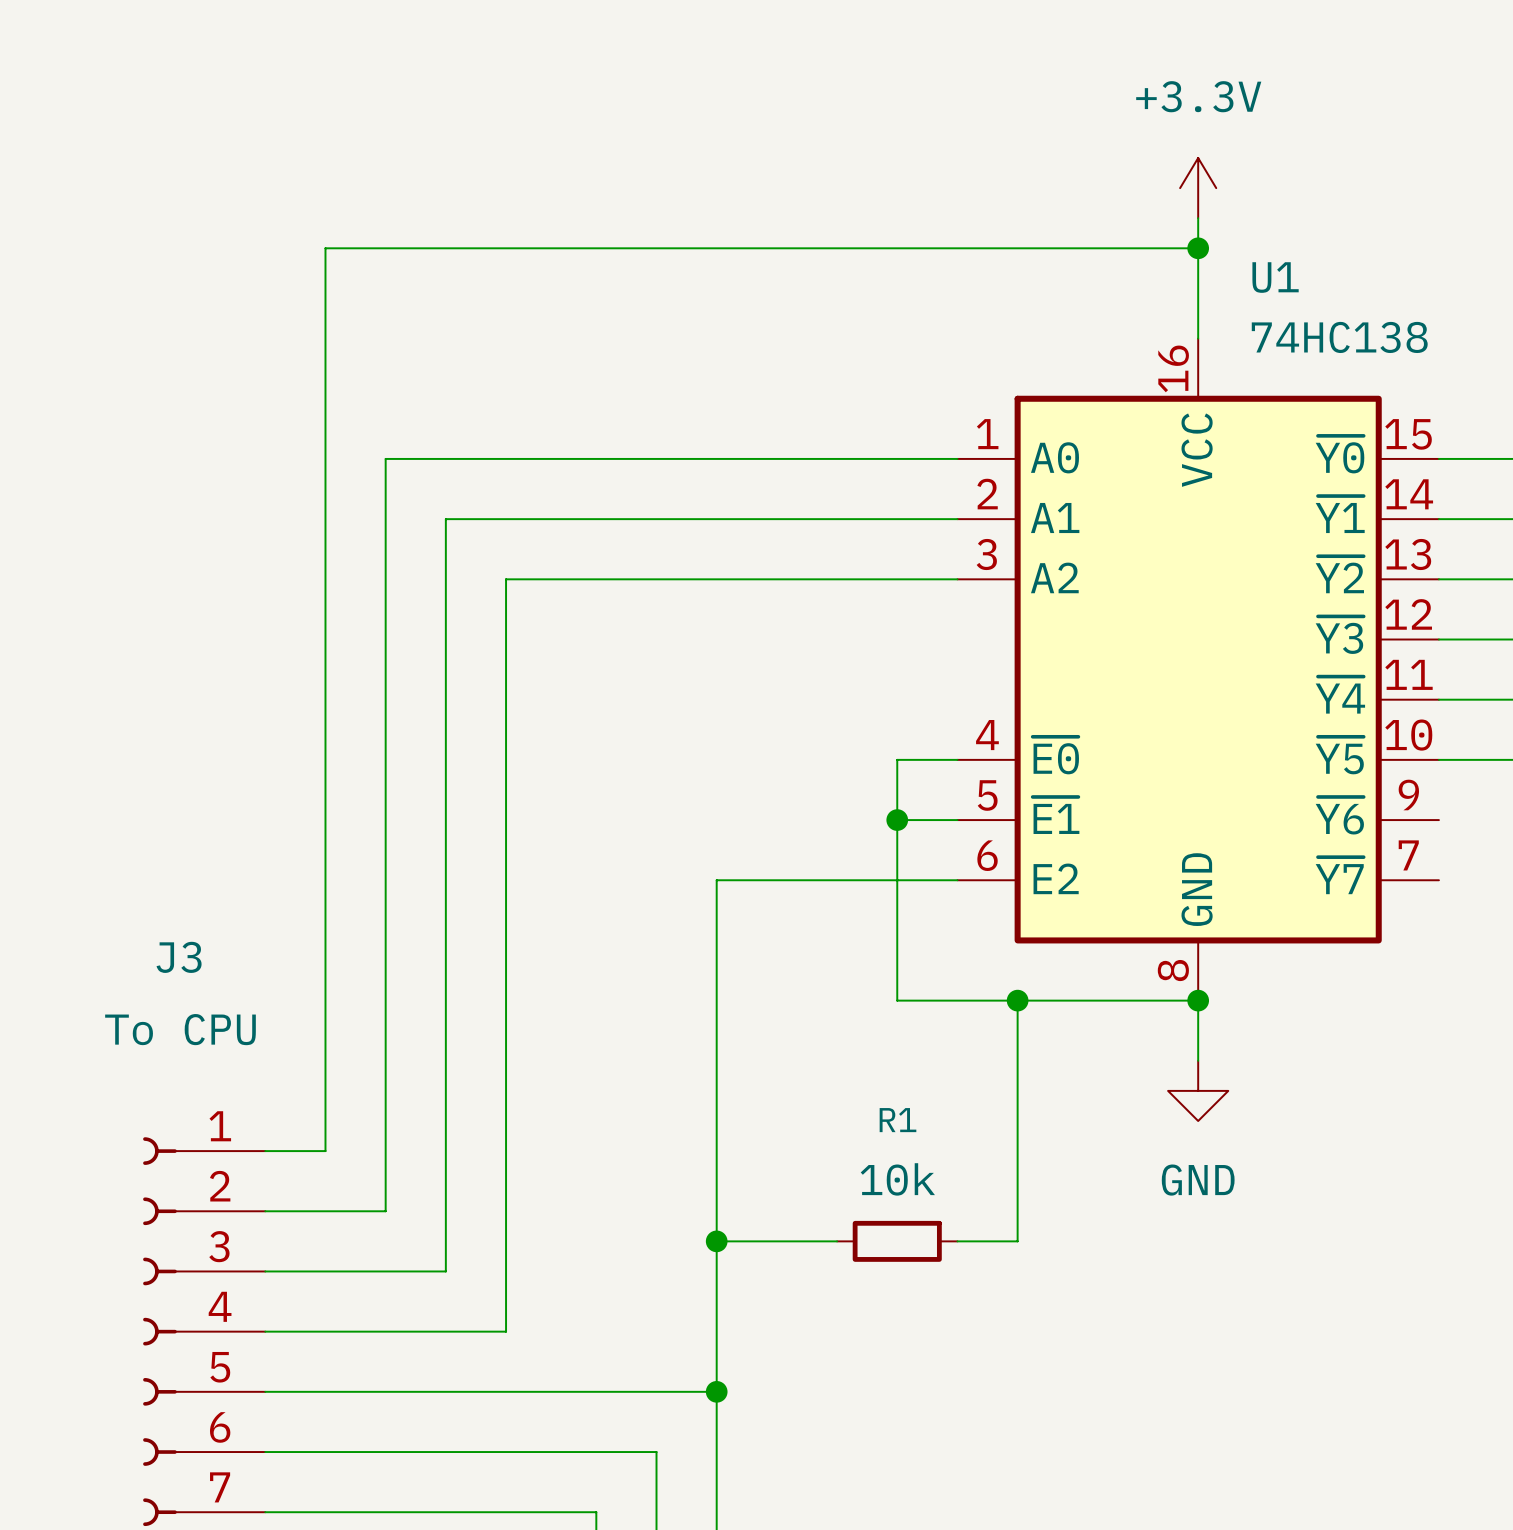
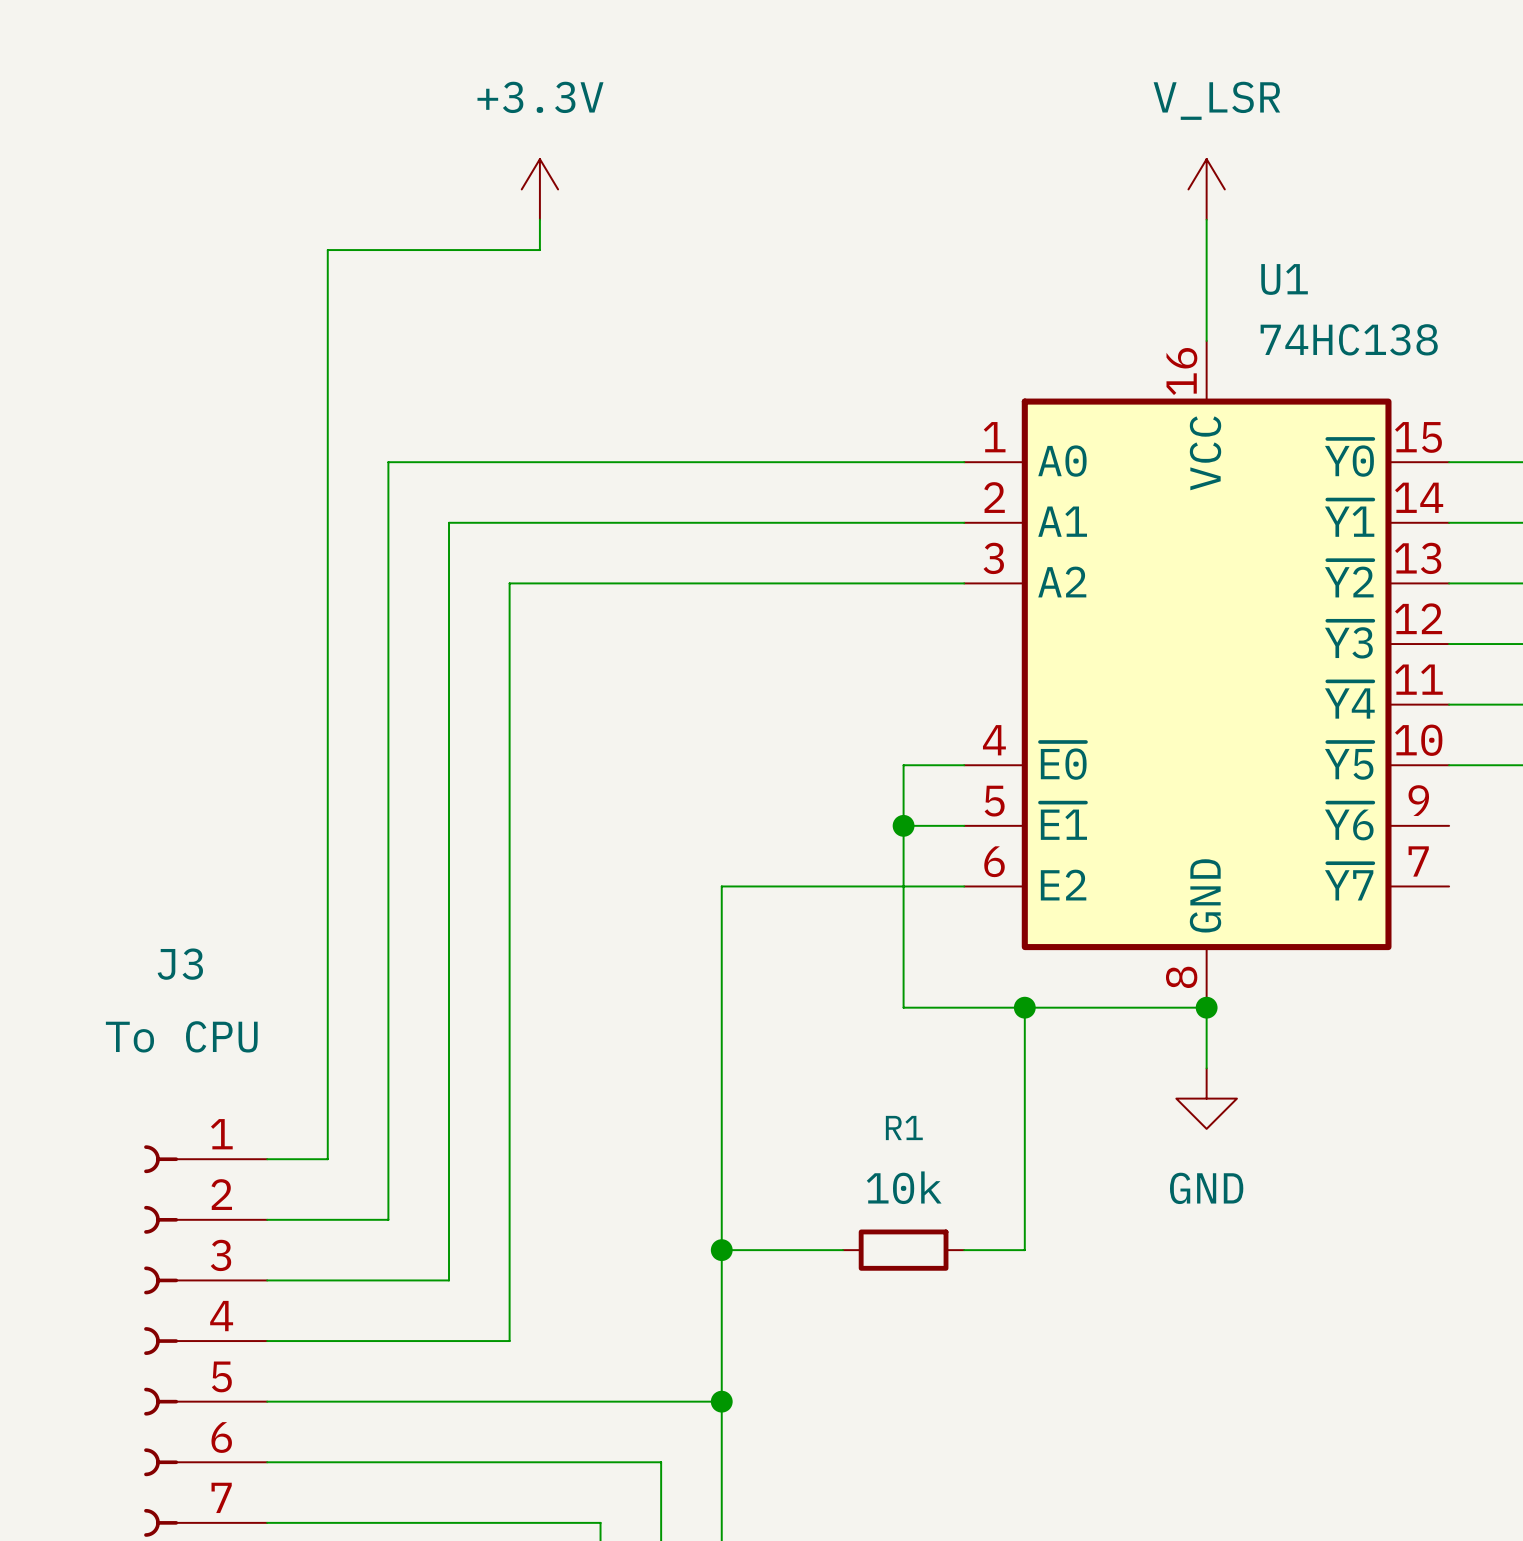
power symbol: none -> +3.3V (539, 189)
power symbol: +3.3V (1198, 188) -> V_LSR (1206, 189)
wire: (536, 248) (1198, 248) -> (539, 250) (539, 219)
junction: (1198, 248) -> none

